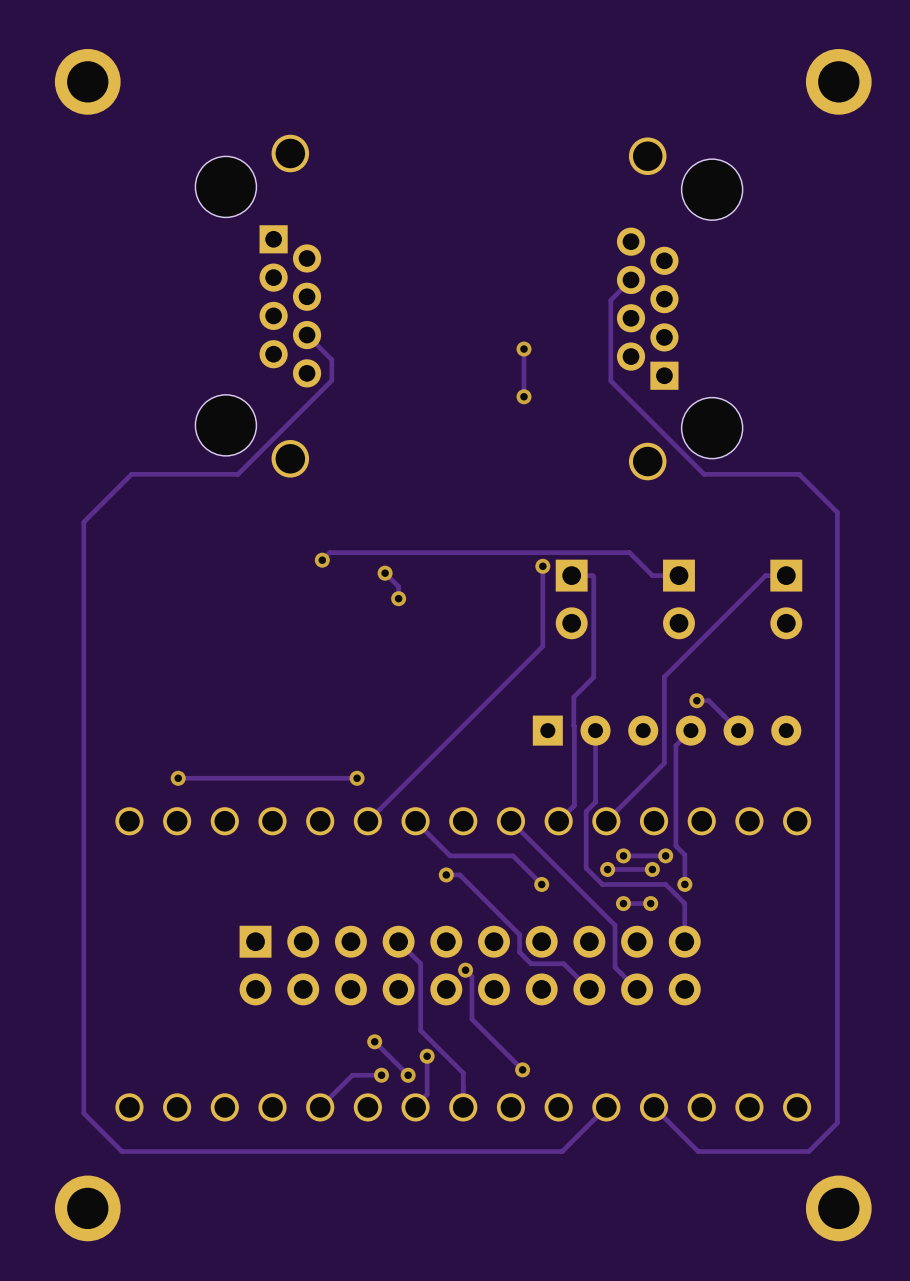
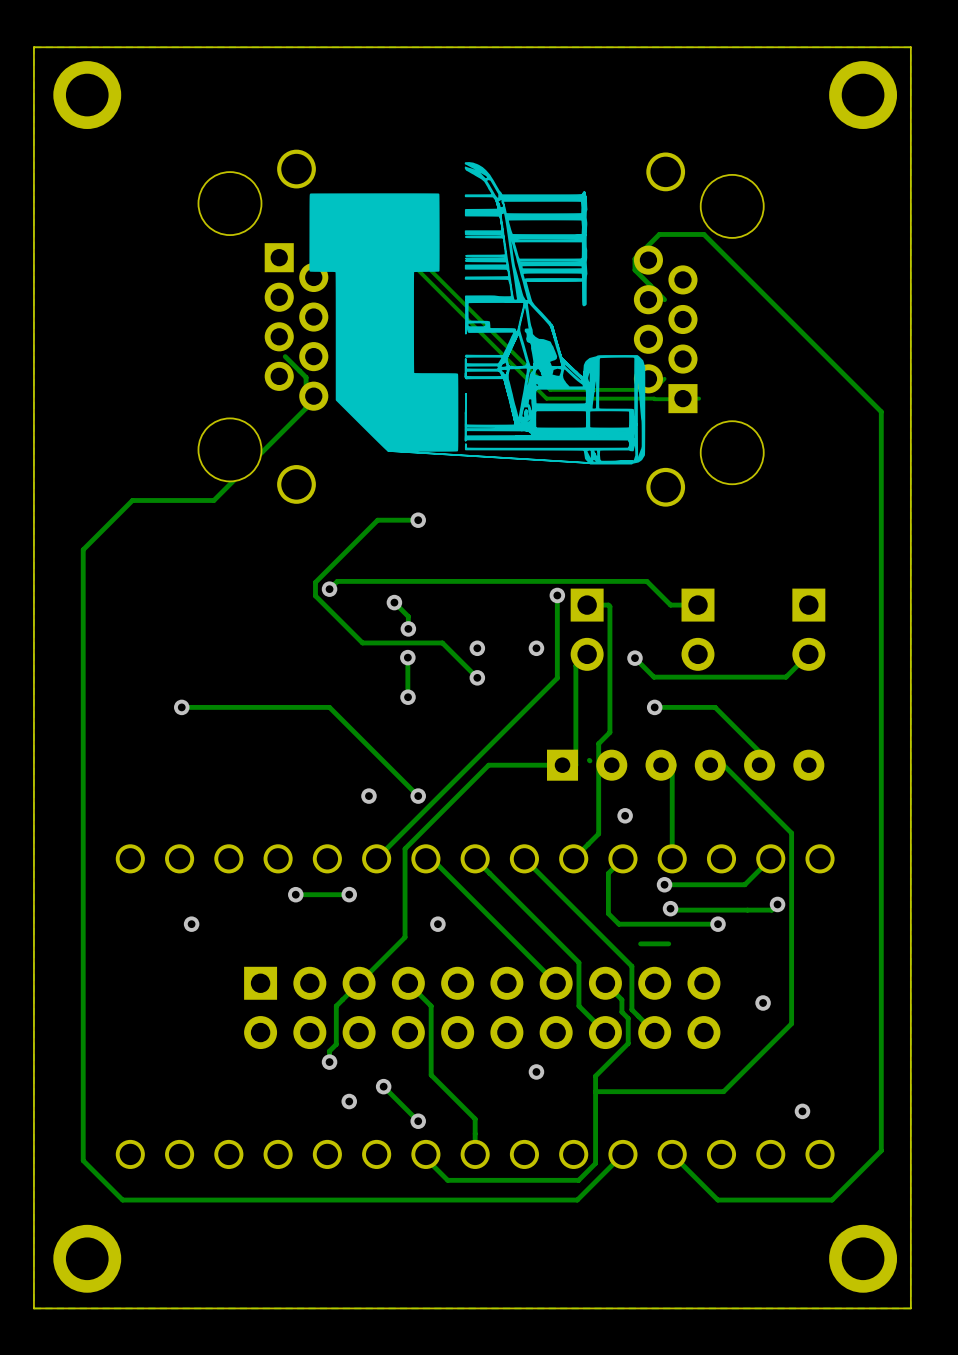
board edge: none -> (910, 47) (910, 1308) (33, 1308) (33, 47) (910, 47)
drawing: none -> [309, 162, 646, 465]
track: none -> (365, 253) (385, 274) (393, 274) (399, 268) (416, 268) (546, 398) (699, 398)
track: none -> (393, 253) (399, 259) (420, 259) (550, 389) (653, 389) (664, 378)
track: (631, 279) (610, 300) (610, 381) (704, 474) (799, 474) (837, 512) (837, 1122) -> (664, 299) (634, 270) (634, 258) (659, 234) (703, 234) (881, 411) (881, 1150) (861, 1170)
track: (307, 335) (331, 359) (331, 380) (237, 474) (210, 474) -> (285, 356) (306, 377) (306, 408) (213, 500)
track: (523, 349) (523, 396) -> none
via: (523, 349) -> none
via: (523, 396) -> none
track: none -> (418, 520) (377, 520) (315, 582) (315, 595) (362, 642) (442, 642) (477, 677)
via: none -> (418, 520)
track: (786, 575) (765, 575) (664, 676) (664, 763) (606, 821) -> none
via: none -> (477, 648)
via: none -> (536, 648)
track: none -> (587, 654) (575, 665) (575, 765) (488, 765) (405, 848) (405, 937) (336, 1006) (336, 1044) (329, 1051) (329, 1062)
track: none -> (808, 654) (786, 677) (653, 677) (634, 658)
track: none -> (407, 657) (407, 697)
via: none -> (407, 657)
via: none -> (634, 658)
via: none -> (477, 677)
via: none -> (408, 697)
track: none -> (181, 707) (329, 707) (418, 796)
via: none -> (181, 707)
track: none -> (654, 707) (715, 707) (772, 765)
via: none -> (654, 707)
track: (593, 677) (573, 697) (573, 725) -> none
track: (696, 700) (708, 700) (738, 730) -> none
via: (696, 700) -> none
track: (574, 726) (574, 805) -> (609, 710) (609, 732) (598, 743) (598, 833) (589, 842)
track: (595, 730) (595, 802) (586, 811) (586, 868) (592, 874) -> (622, 858) (608, 873) (608, 913)
track: none -> (674, 765) (672, 767) (672, 858)
track: (690, 730) (675, 745) (675, 845) (684, 854) (684, 884) -> none
track: none -> (723, 765) (791, 833) (791, 1023) (723, 1091) (595, 1091)
via: none -> (418, 796)
via: (178, 778) -> none
track: (357, 778) (178, 778) -> none
via position: (357, 778) -> (368, 796)
via: none -> (625, 815)
track: (415, 821) (450, 855) (513, 855) (541, 884) -> (425, 858) (431, 858) (556, 983)
track: none -> (770, 858) (744, 884) (664, 884)
via: none -> (664, 884)
via: none -> (295, 894)
track: none -> (349, 894) (295, 894)
via: none -> (349, 894)
via: (623, 855) -> none
track: (665, 855) (623, 855) -> none
via: (665, 855) -> none
track: none -> (777, 904) (771, 910) (670, 910)
via: none -> (777, 904)
via: (607, 869) -> none
track: (652, 869) (607, 869) -> none
track: (446, 874) (459, 874) (519, 934) (519, 952) (531, 963) (563, 963) -> (475, 858) (578, 962) (578, 1006)
via position: (446, 874) -> (437, 924)
via: none -> (191, 924)
via: (541, 884) -> none
track: (665, 884) (684, 903) (684, 941) -> (684, 924) (718, 924)
via position: (684, 884) -> (718, 924)
via: (623, 903) -> none
via: (650, 903) -> none
via: none -> (763, 1002)
track: (465, 970) (471, 976) (471, 1019) (522, 1069) -> none
via: (465, 970) -> none
via: none -> (329, 1062)
via: none -> (536, 1071)
via: none -> (349, 1101)
track: (427, 1056) (427, 1094) (415, 1107) -> (605, 983) (621, 999) (621, 1012) (628, 1018) (628, 1043) (595, 1076) (595, 1163) (578, 1180) (447, 1180) (425, 1158) (425, 1154)
via: (427, 1056) -> none
via: none -> (802, 1111)
via: (522, 1069) -> none
track: (381, 1075) (352, 1075) (320, 1107) -> none
via: (381, 1075) -> none

